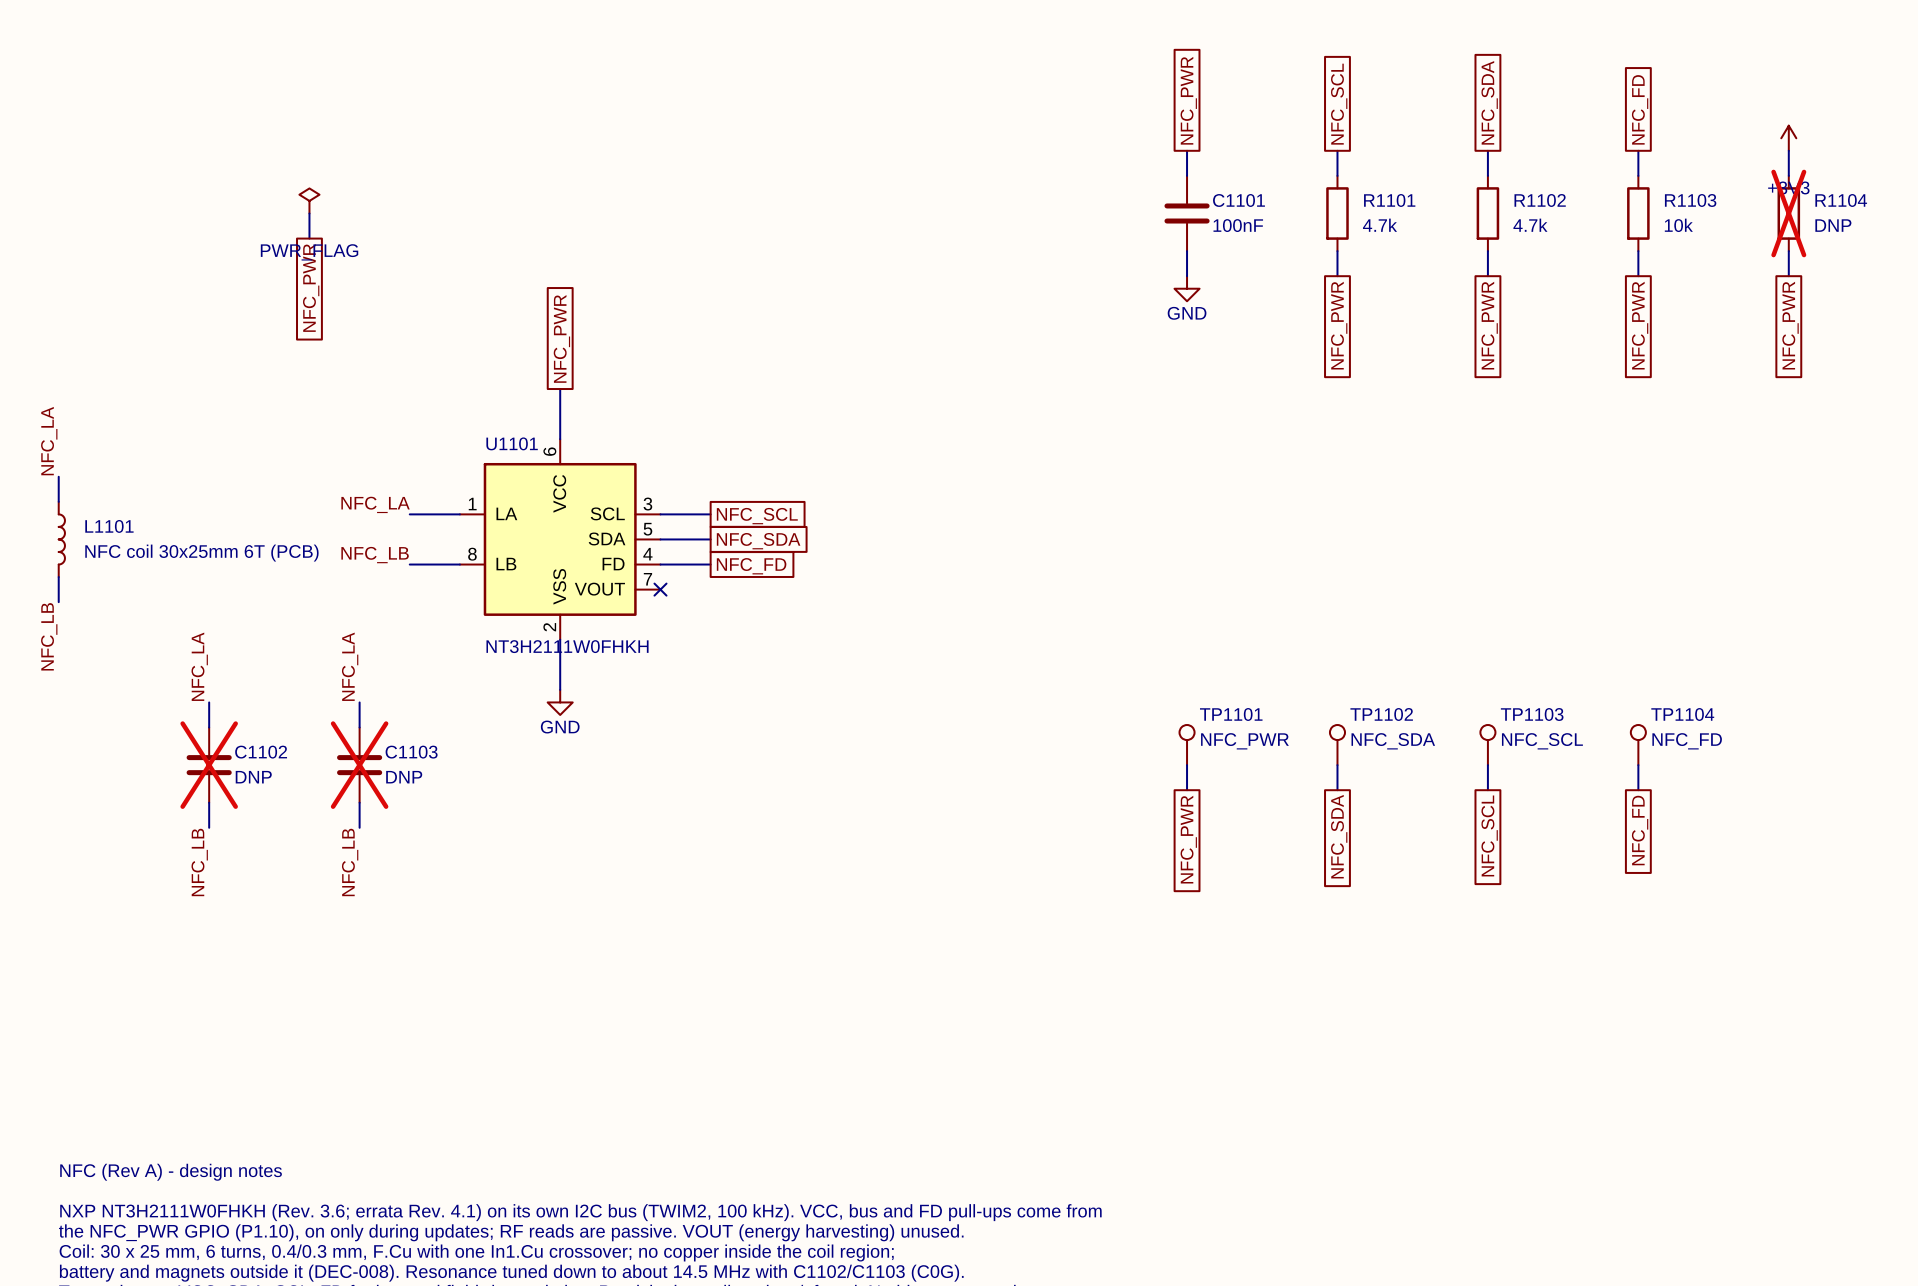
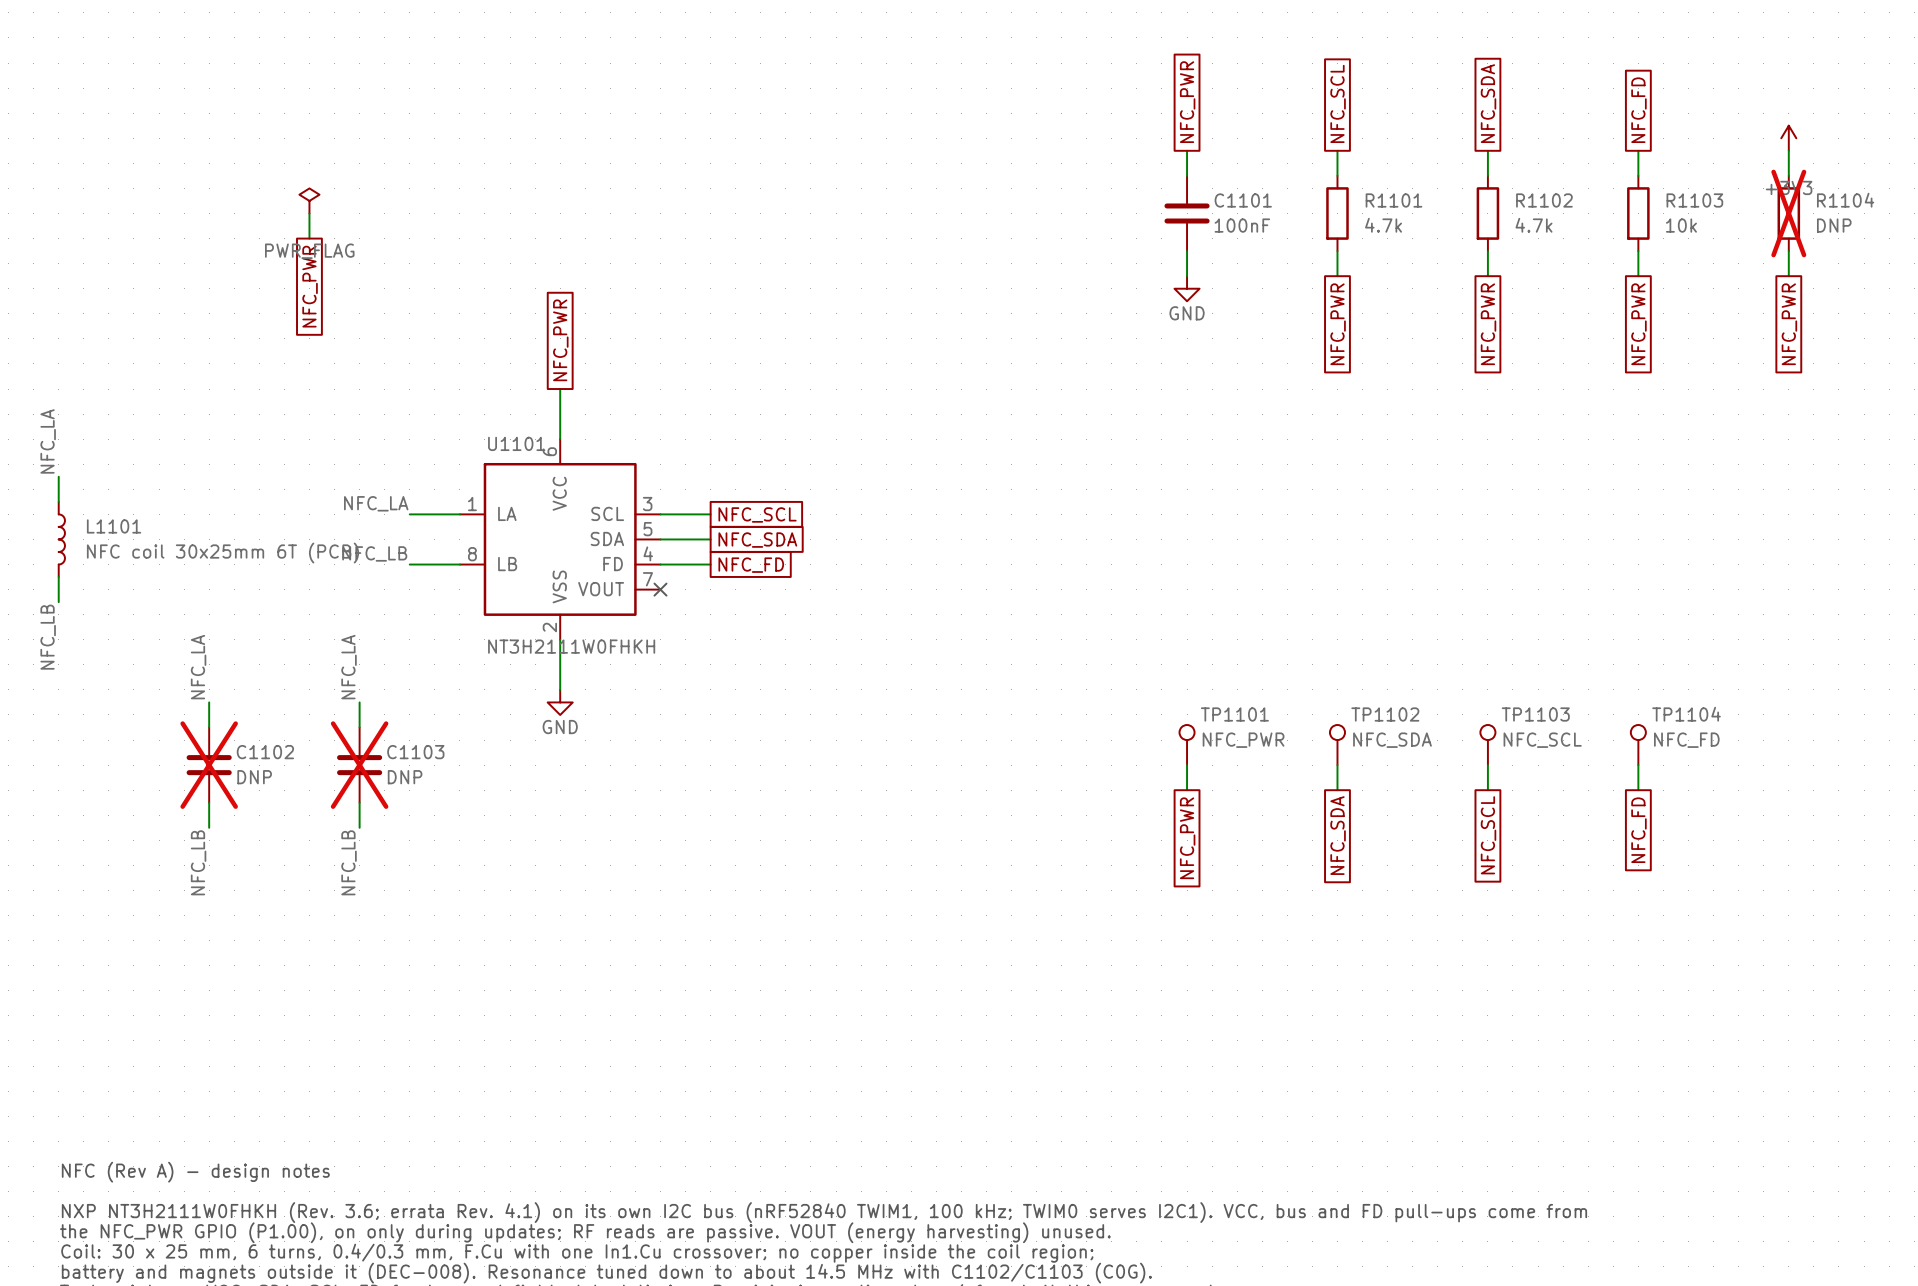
text: NXP NT3H2111W0FHKH (Rev. 3.6; errata Rev. 4.1) on its own I2C bus (TWIM2, 100 kHz). VCC, bus and FD pull-ups come from (580, 1212) -> NXP NT3H2111W0FHKH (Rev. 3.6; errata Rev. 4.1) on its own I2C bus (nRF52840 TWIM1, 100 kHz; TWIM0 serves I2C1). VCC, bus and FD pull-ups come from (824, 1212)
text: the NFC_PWR GPIO (P1.10), on only during updates; RF reads are passive. VOUT (energy harvesting) unused. (511, 1232) -> the NFC_PWR GPIO (P1.00), on only during updates; RF reads are passive. VOUT (energy harvesting) unused. (585, 1232)

